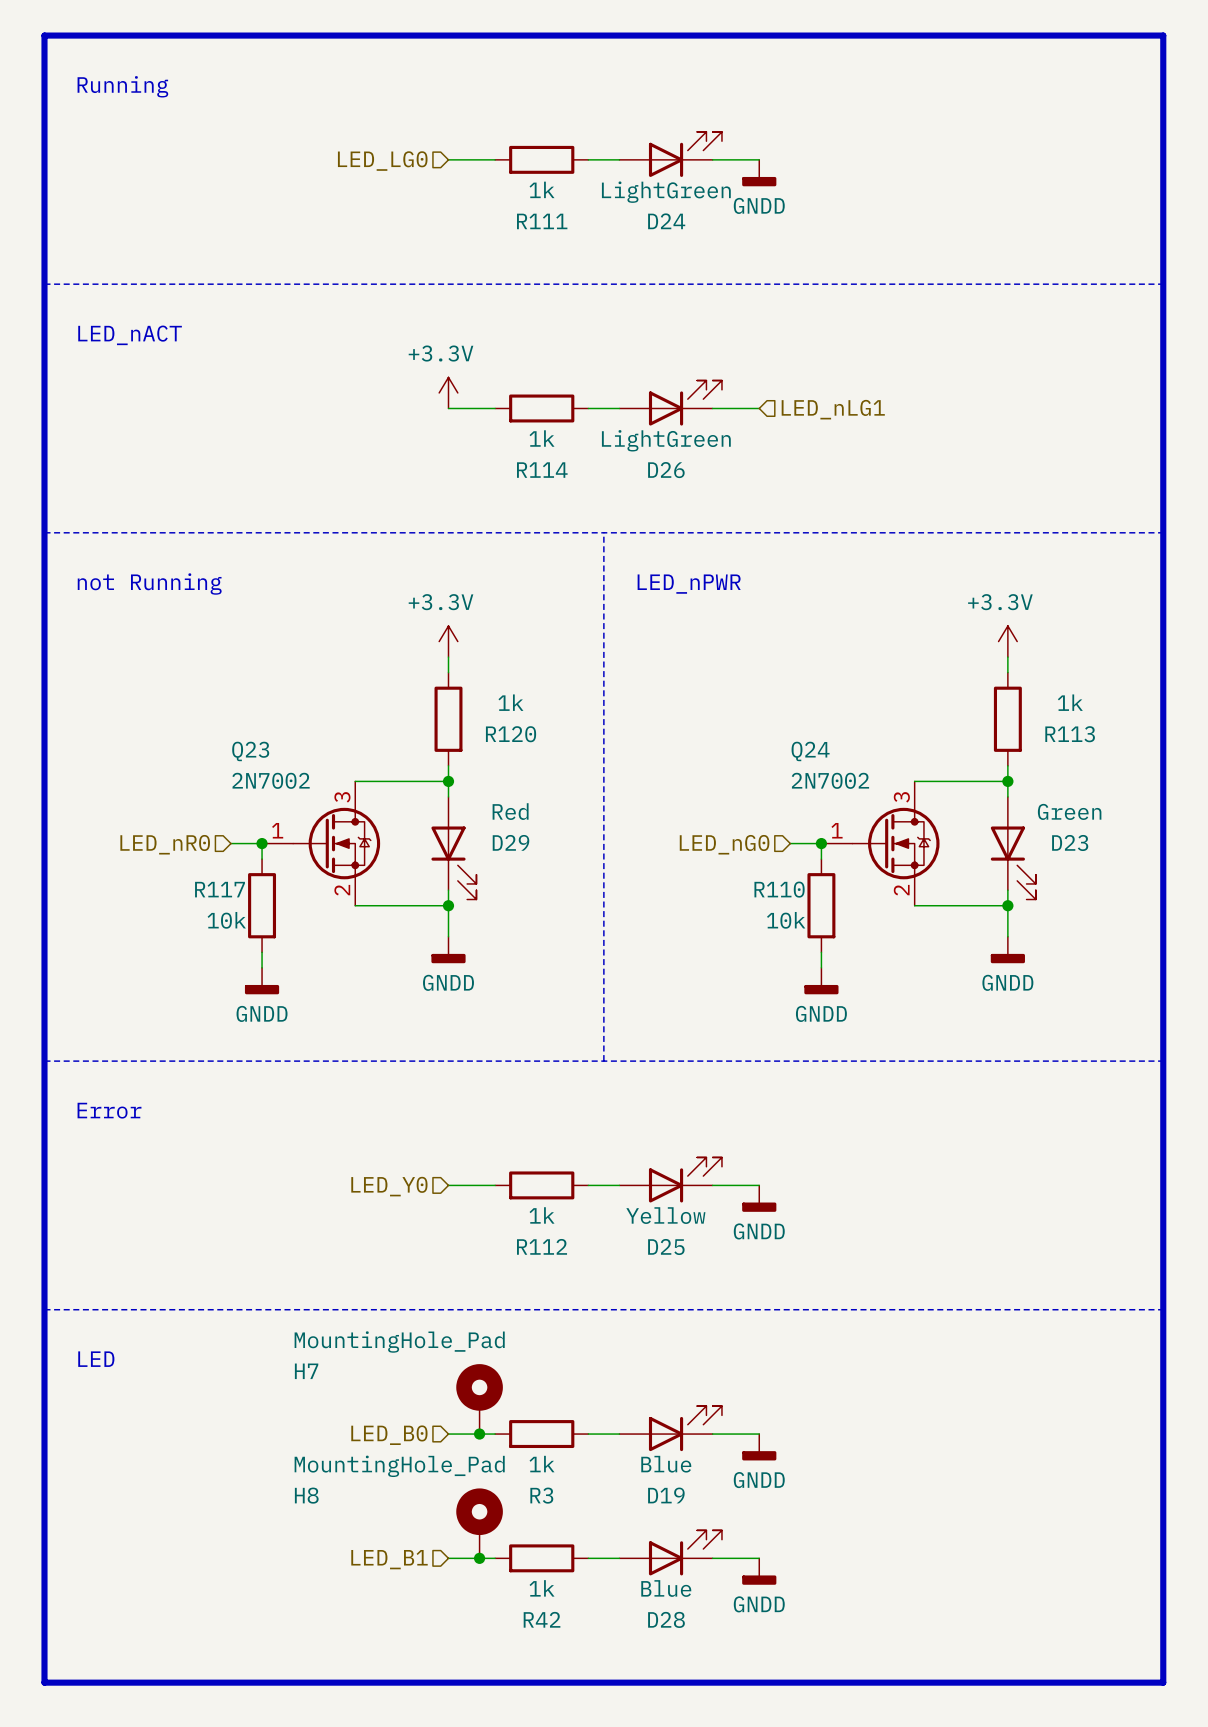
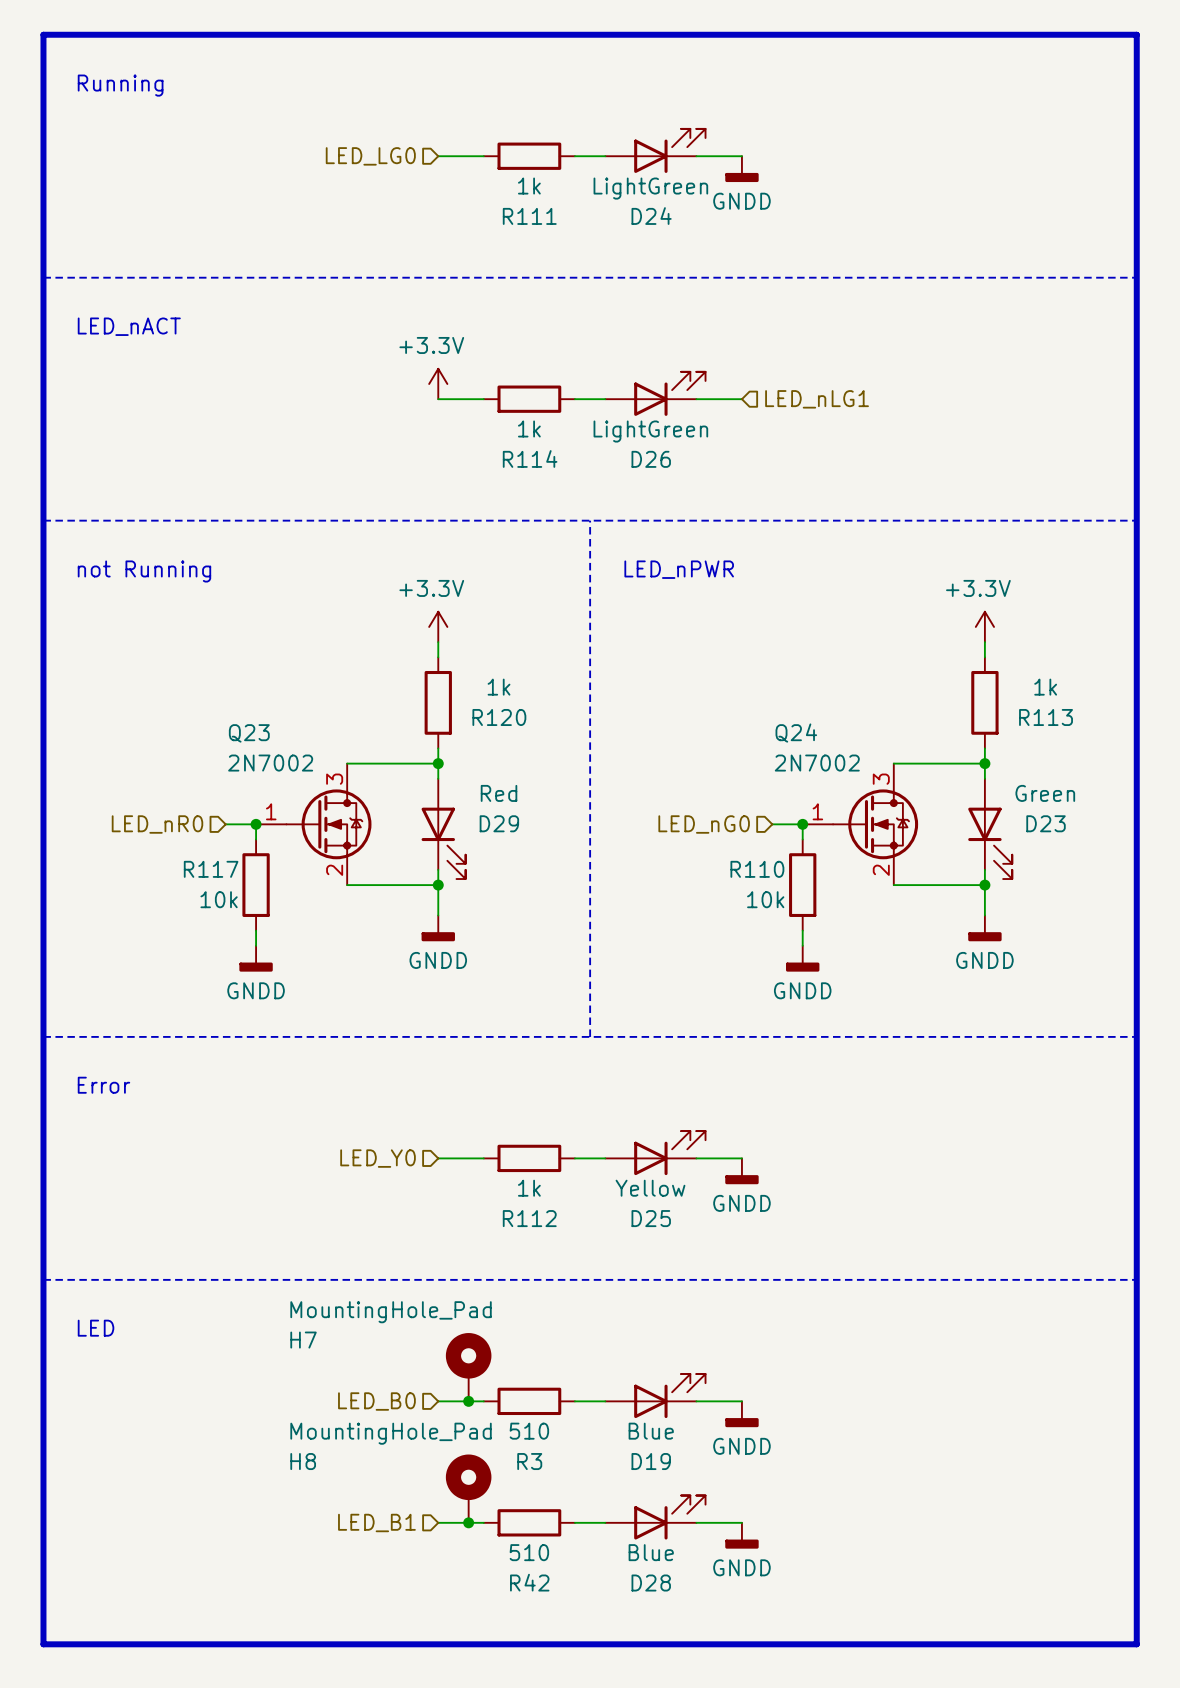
R3 value: 1k (542, 1464) -> 510 (529, 1431)
R42 value: 1k (542, 1588) -> 510 (529, 1552)

